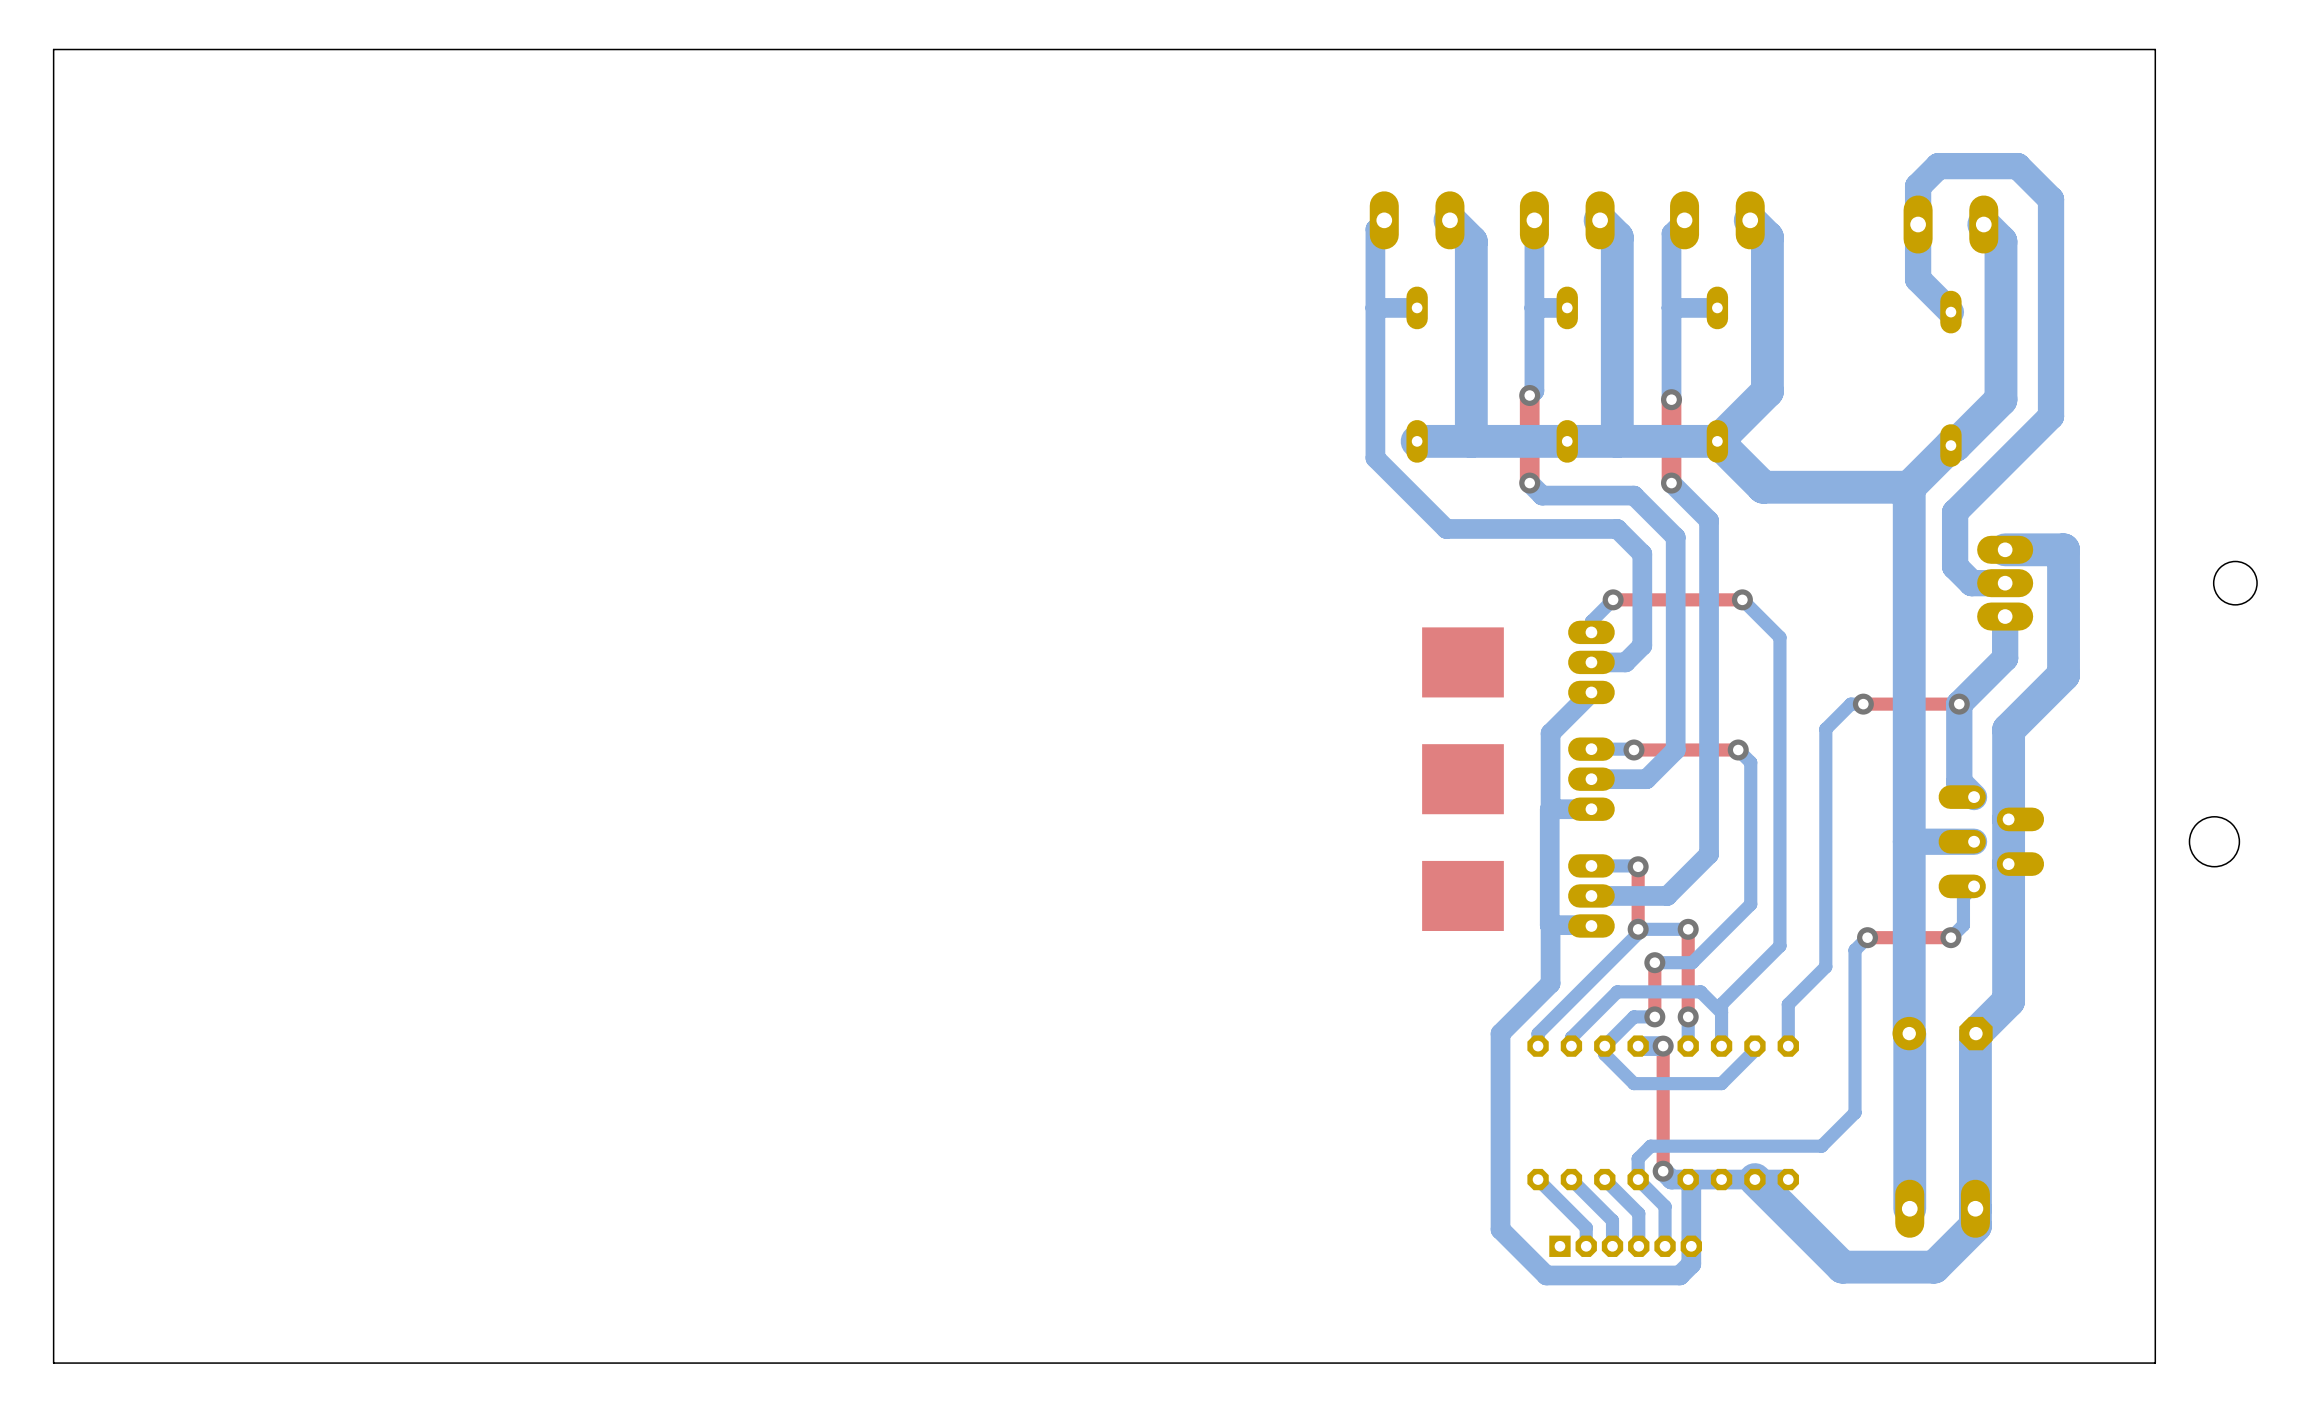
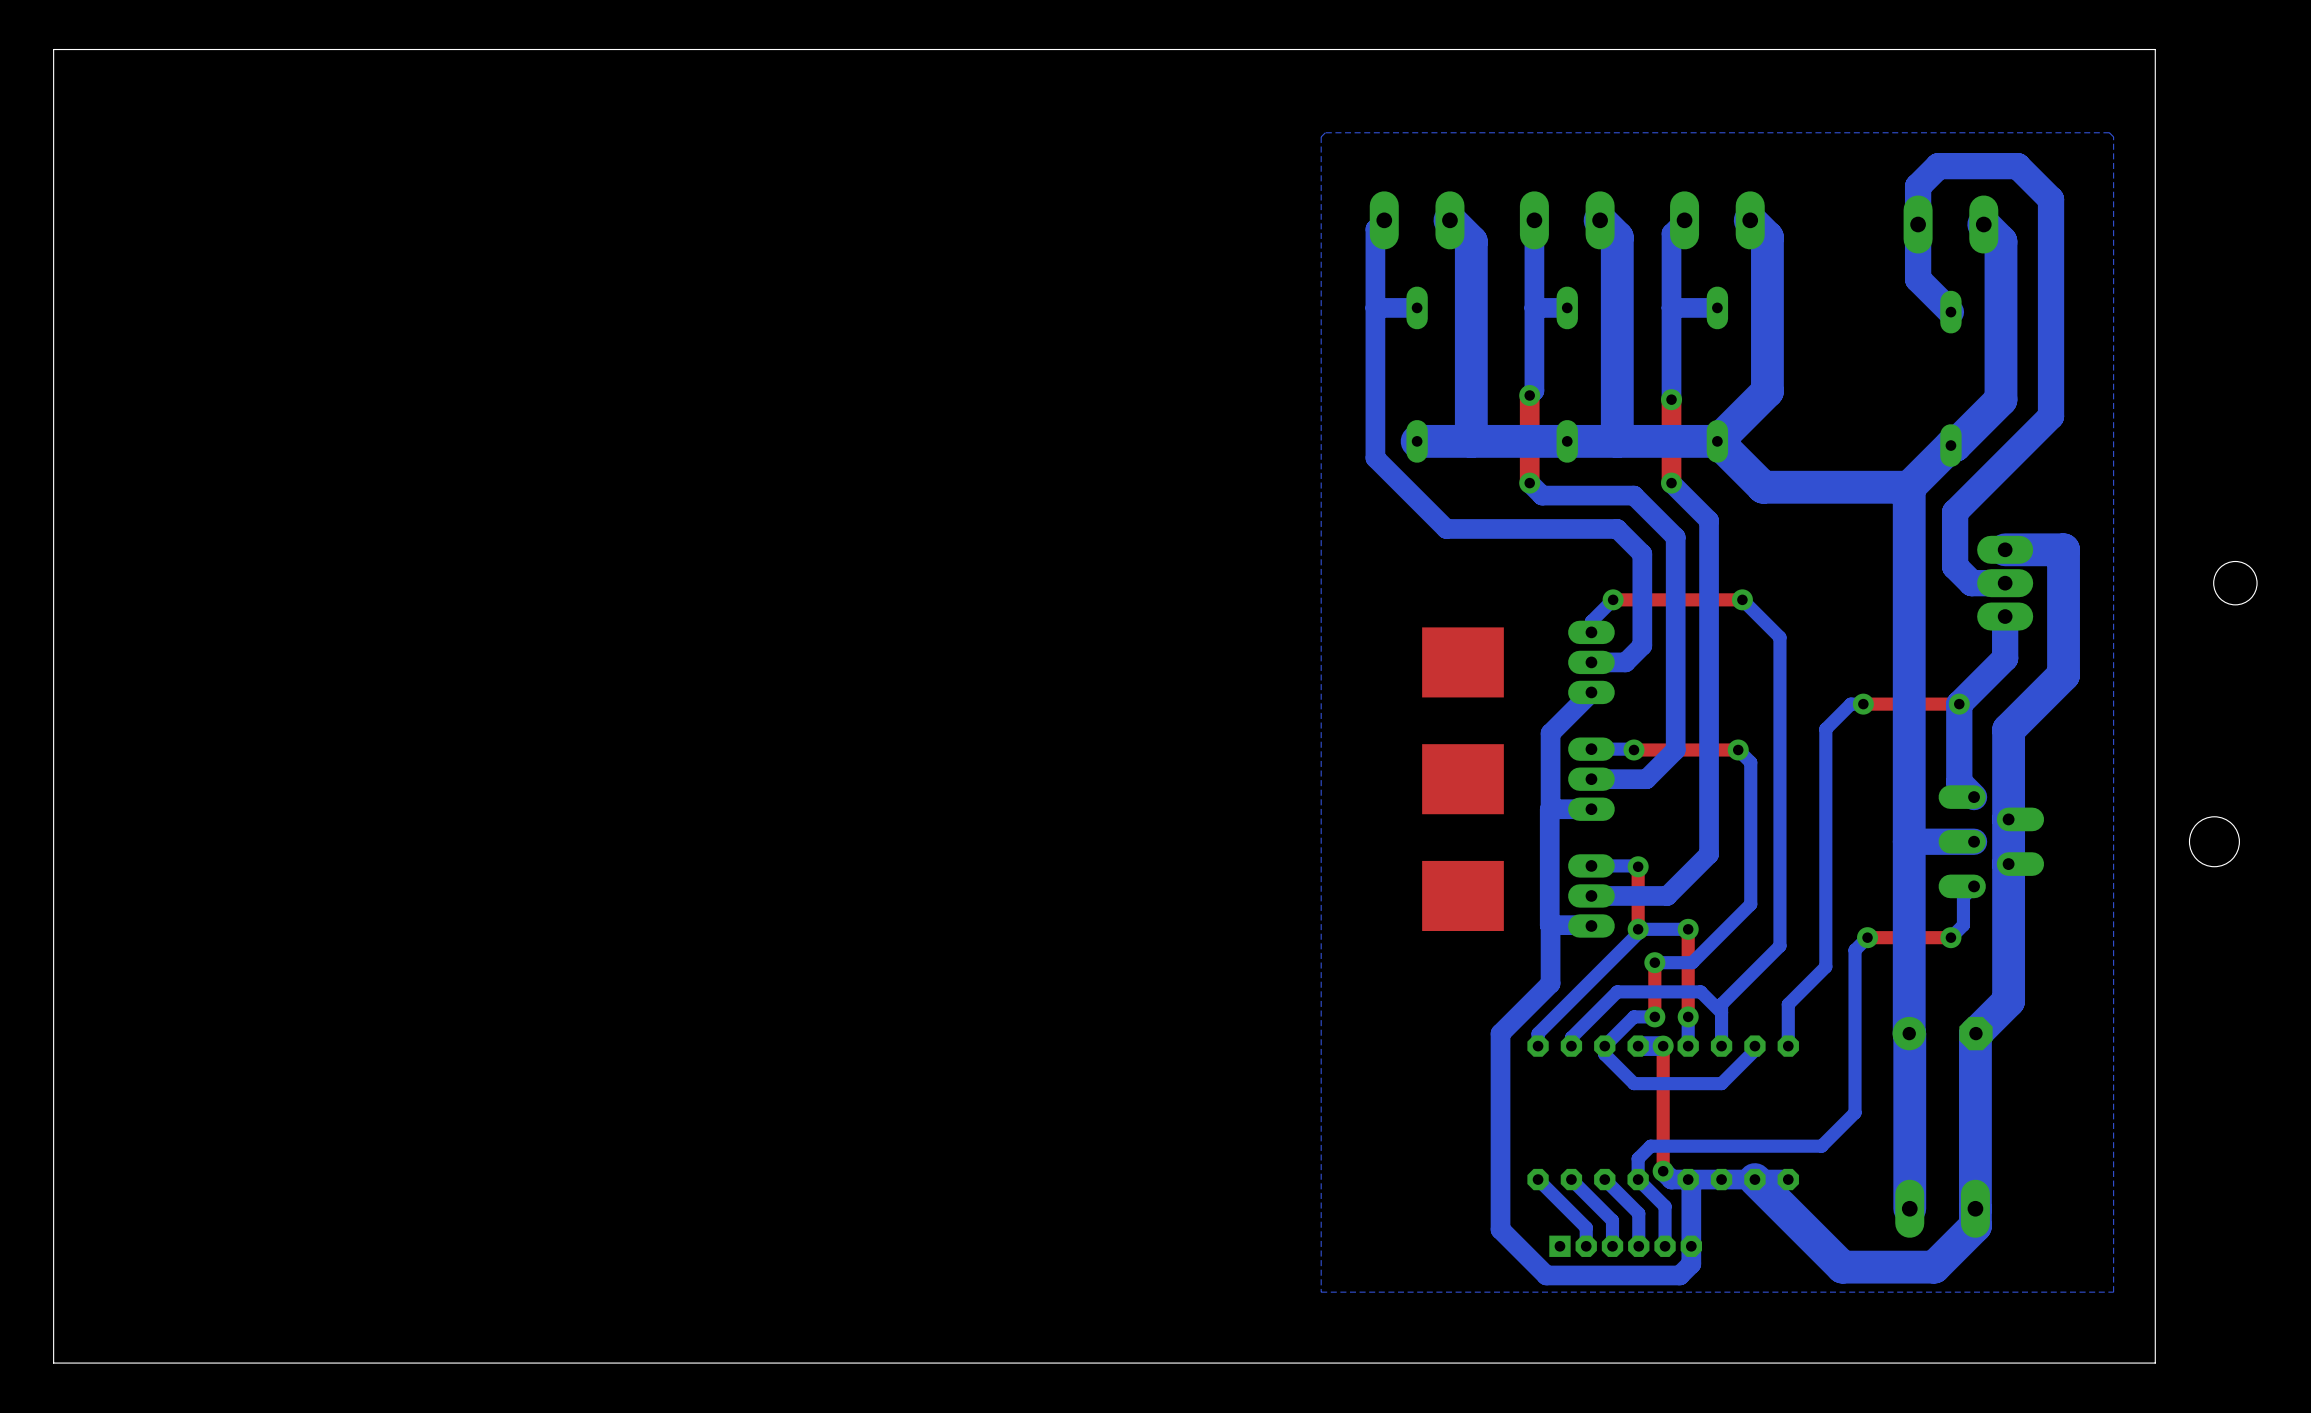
bottom zone outline: none -> (2109, 132) (1325, 132) (1321, 136) (1321, 1292) (2113, 1292) (2113, 136) (2109, 132)

